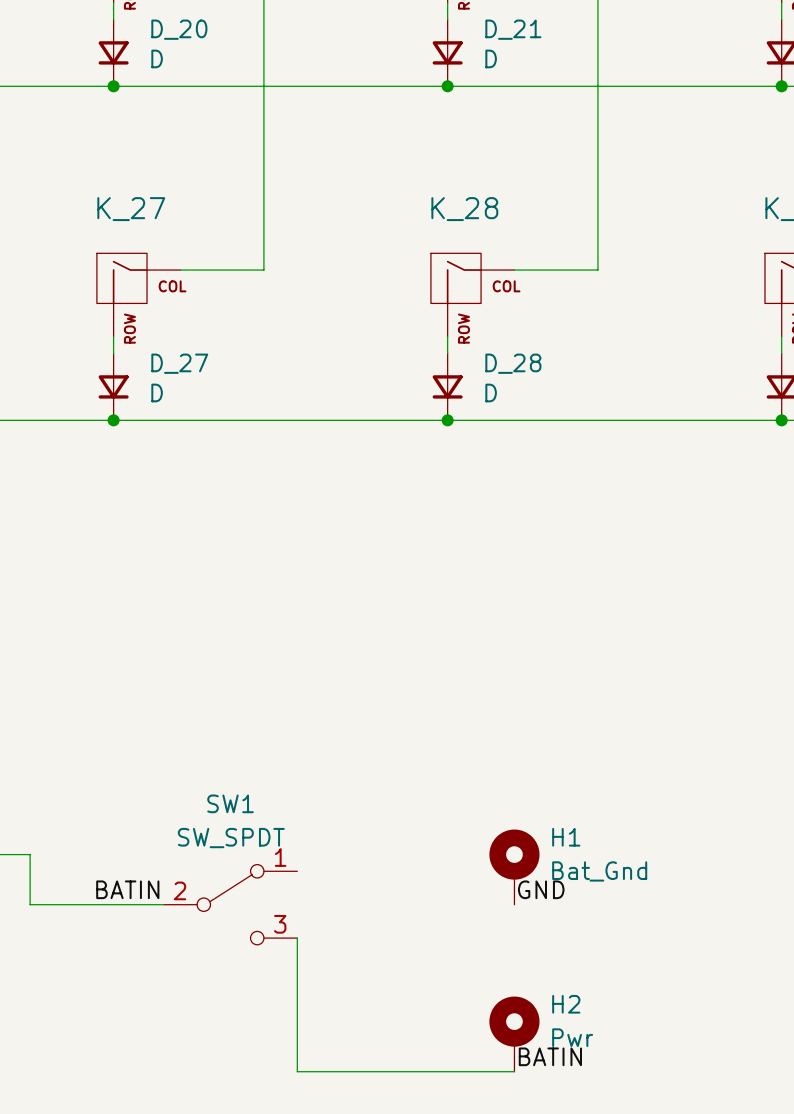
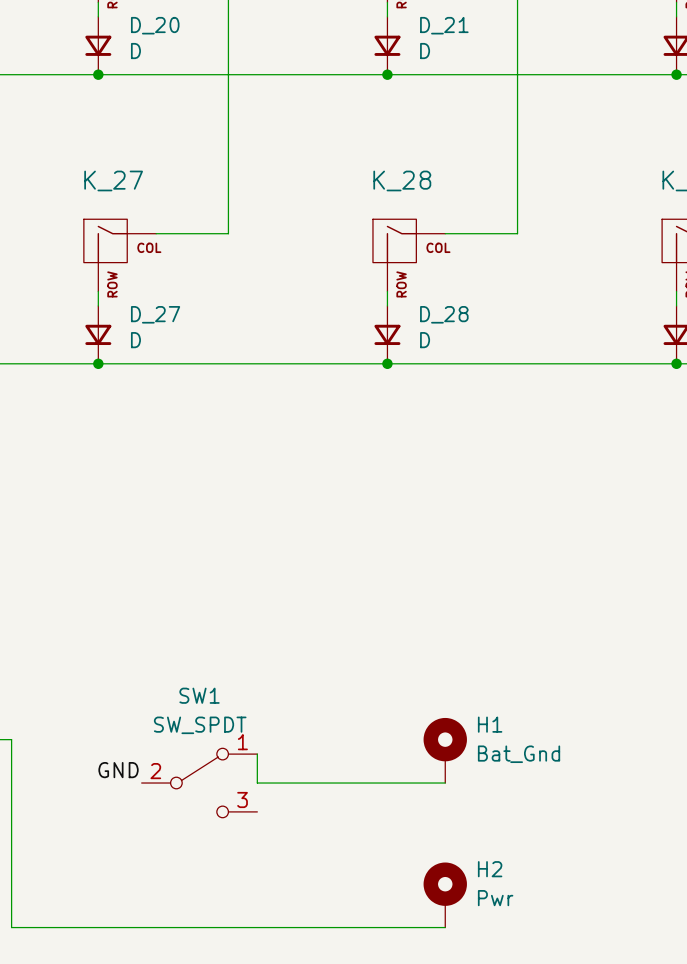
wire: (13, 854) (30, 854) (30, 904) (163, 904) -> (11, 739) (11, 927) (257, 927)
wire: none -> (257, 754) (257, 783) (445, 783)
label: BATIN (127, 889) -> GND (118, 770)
label: GND (541, 889) -> none
wire: (297, 938) (297, 1071) -> none
label: BATIN (550, 1056) -> none

